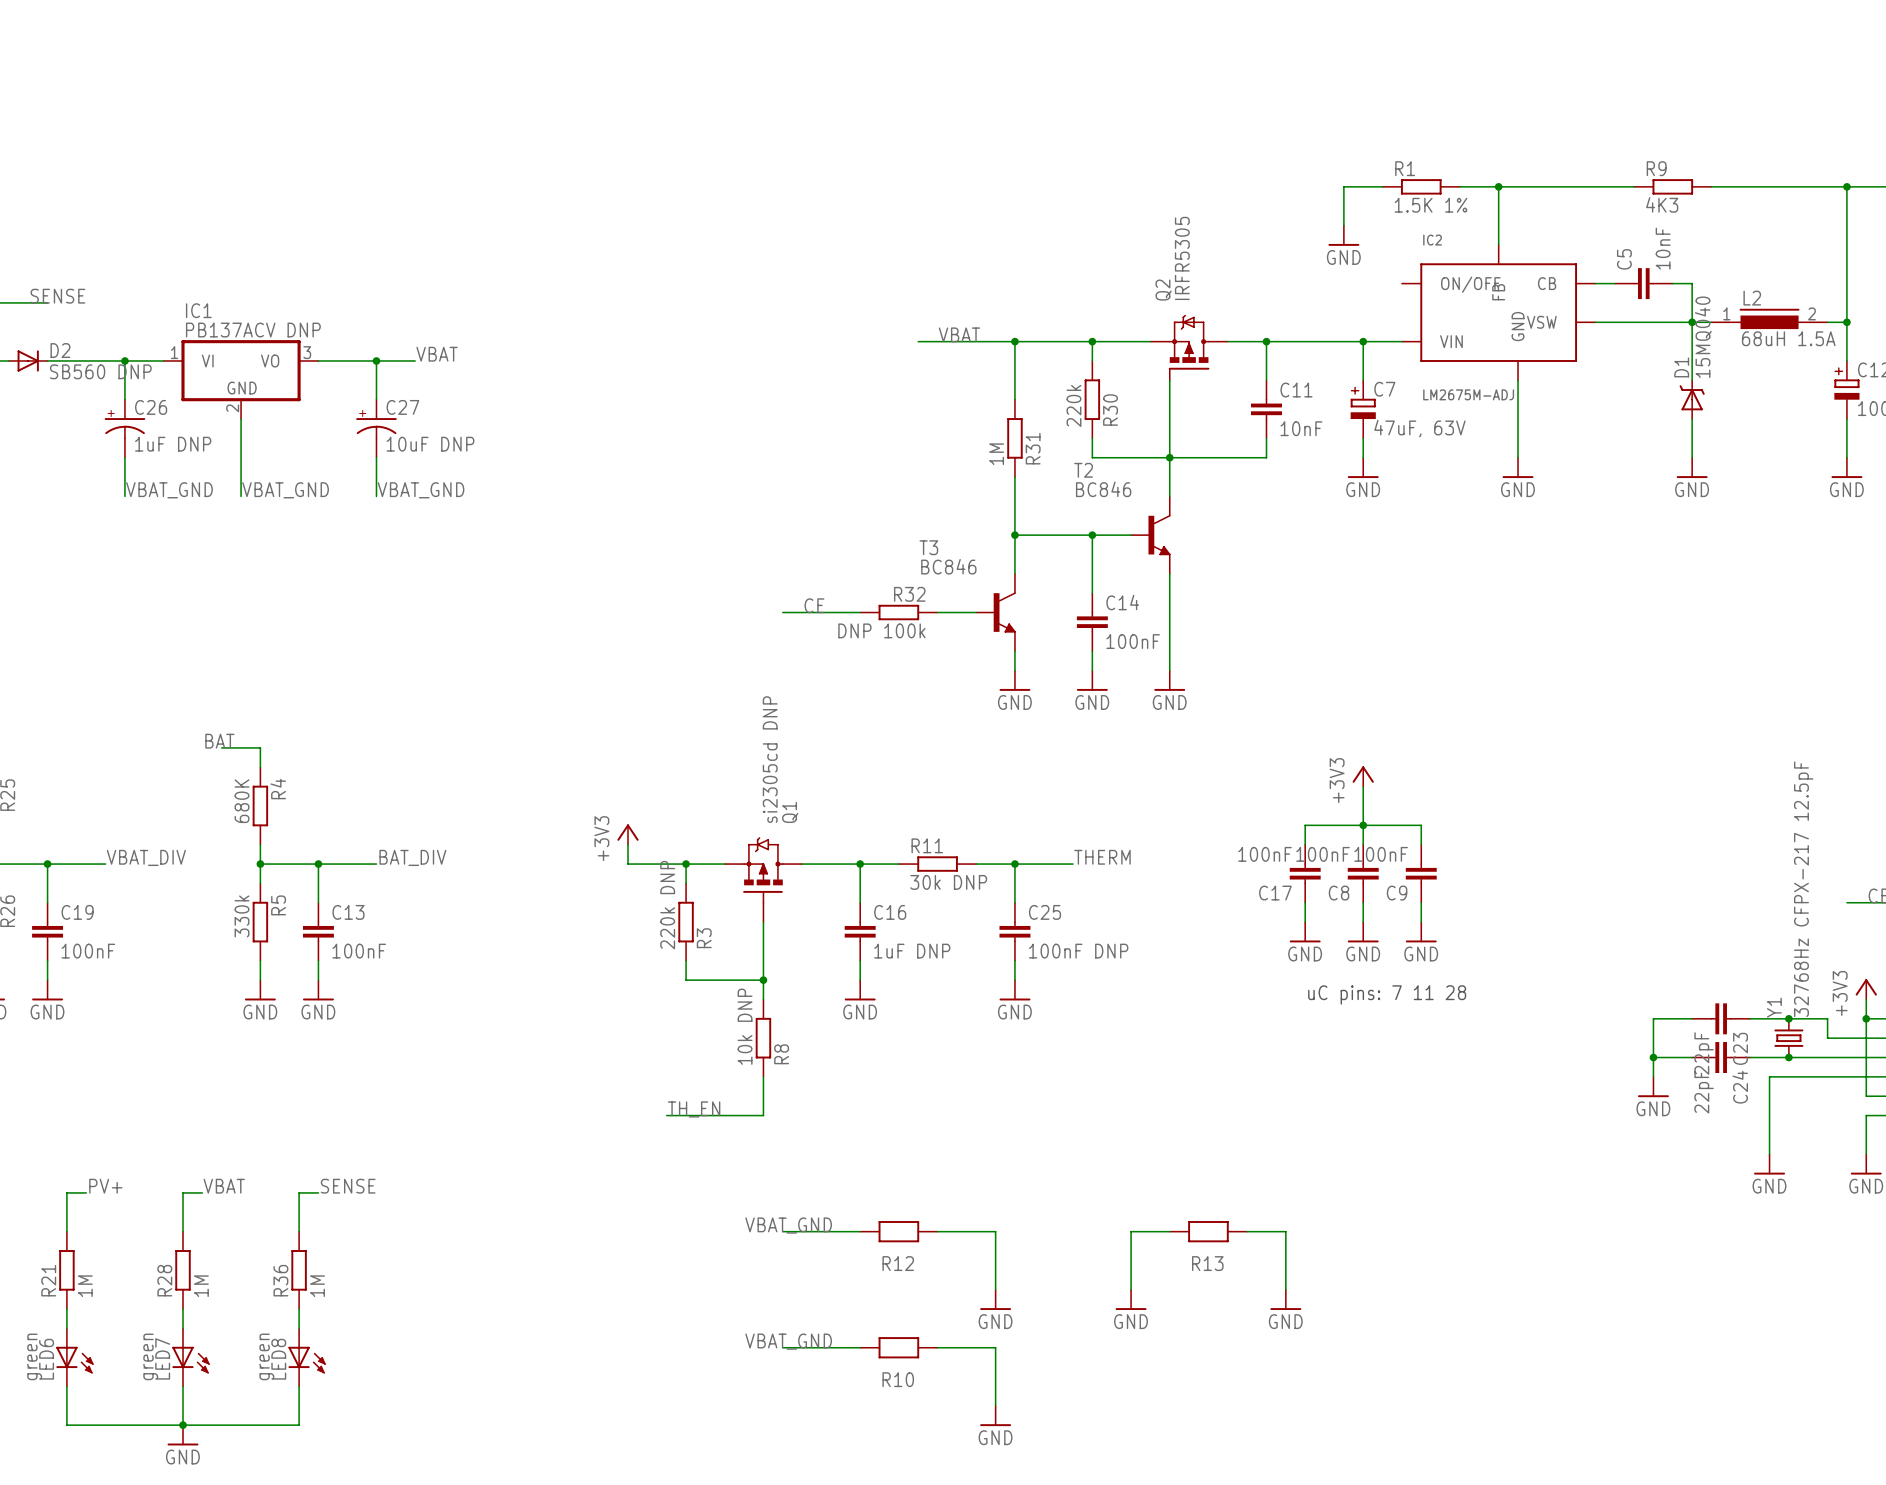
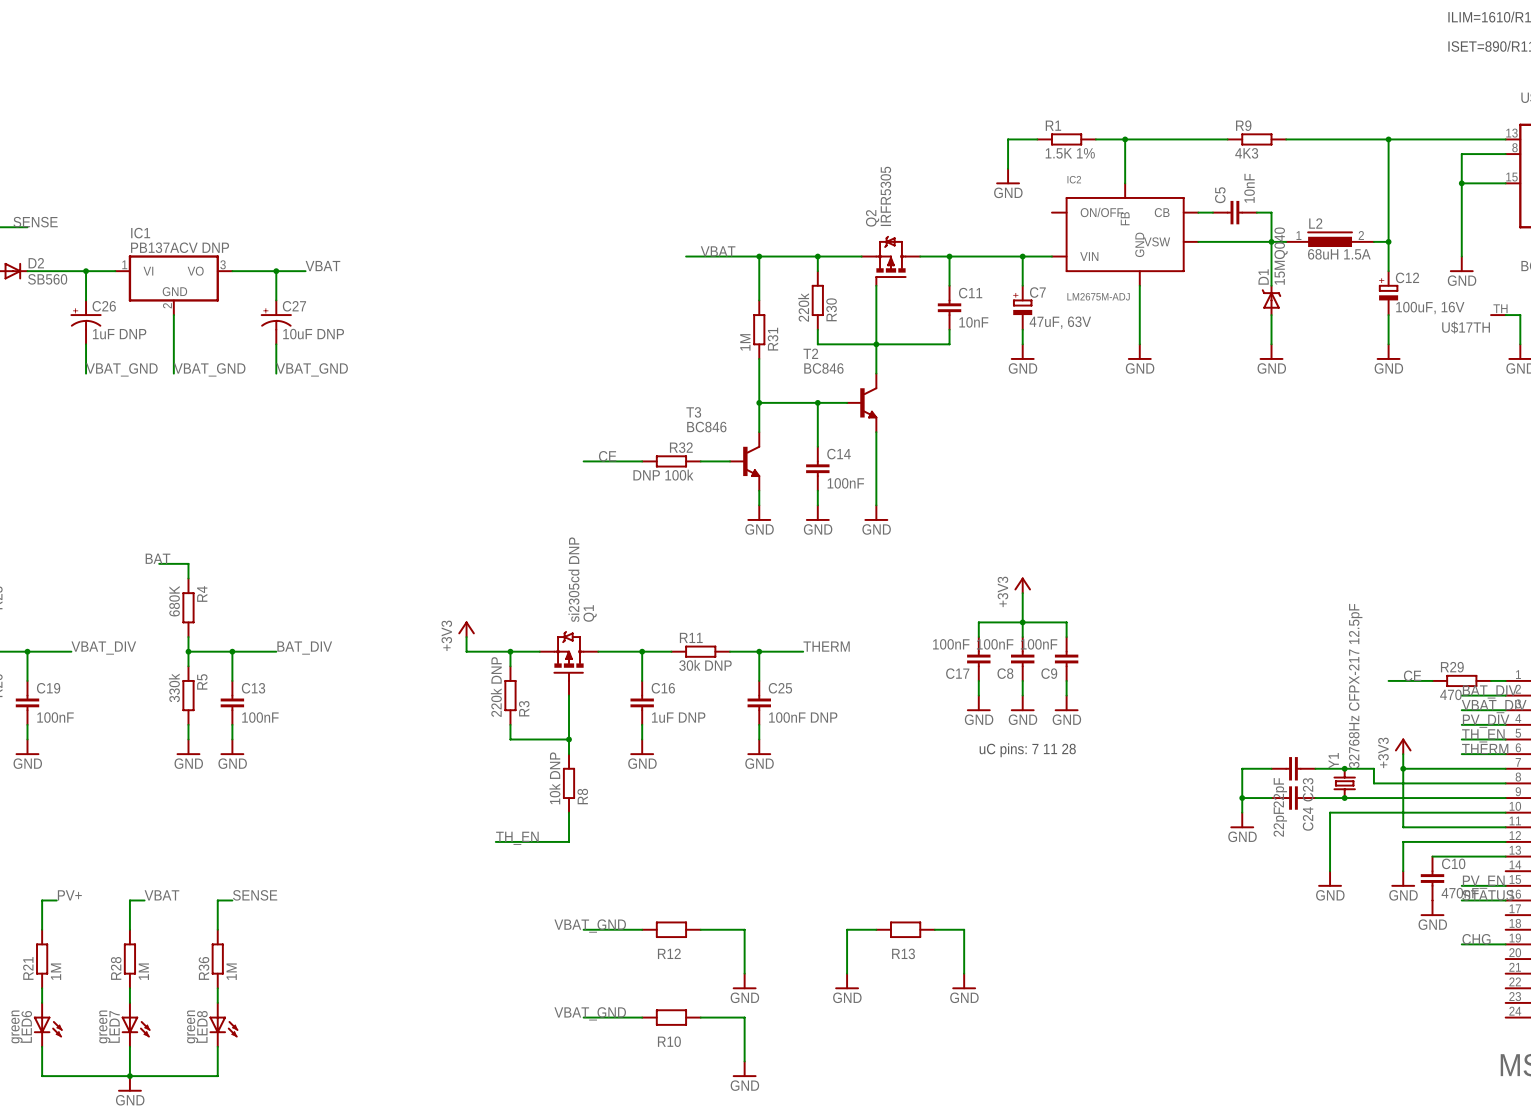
D2 value: SB560 DNP (100, 371) -> SB560 (47, 279)

